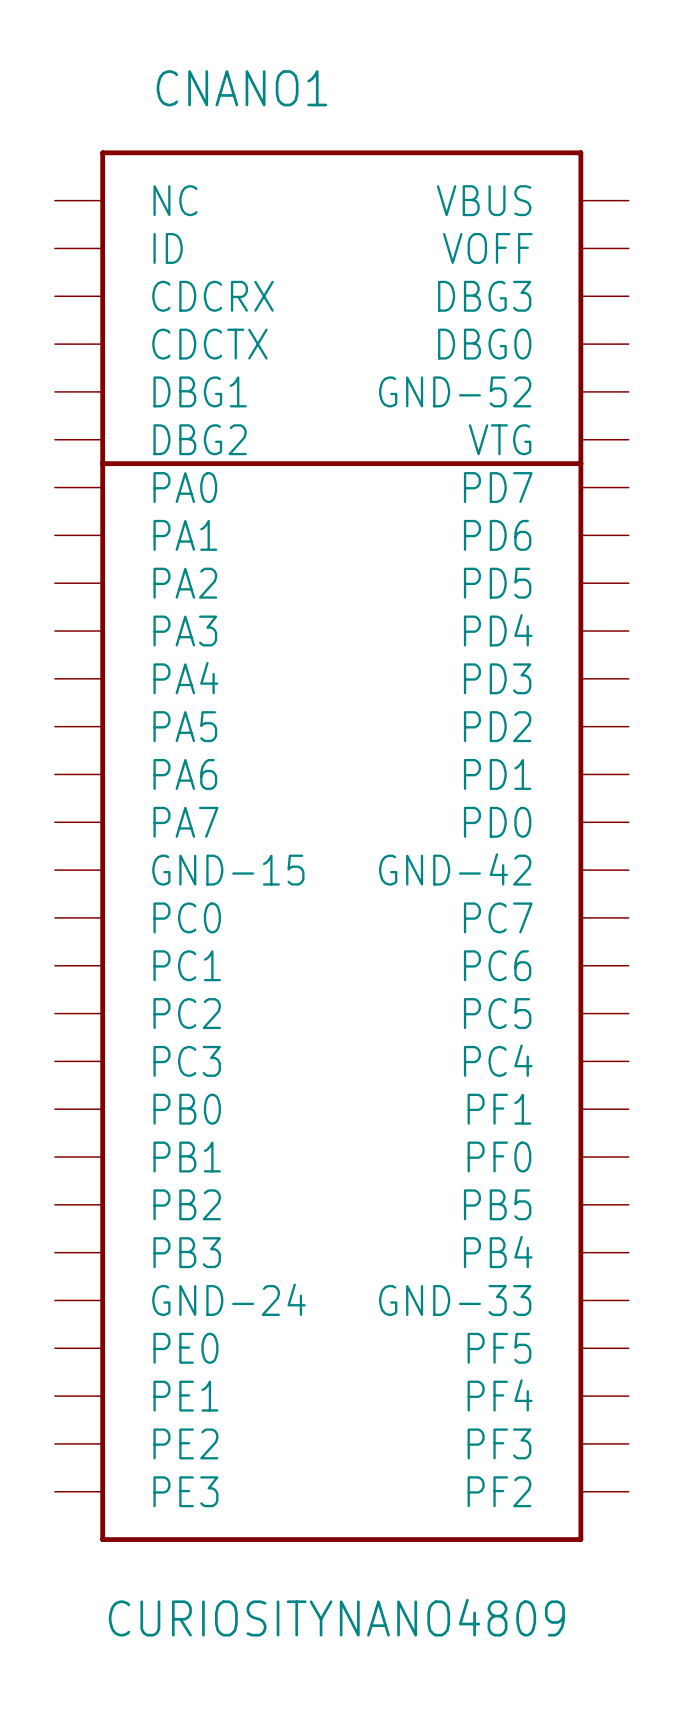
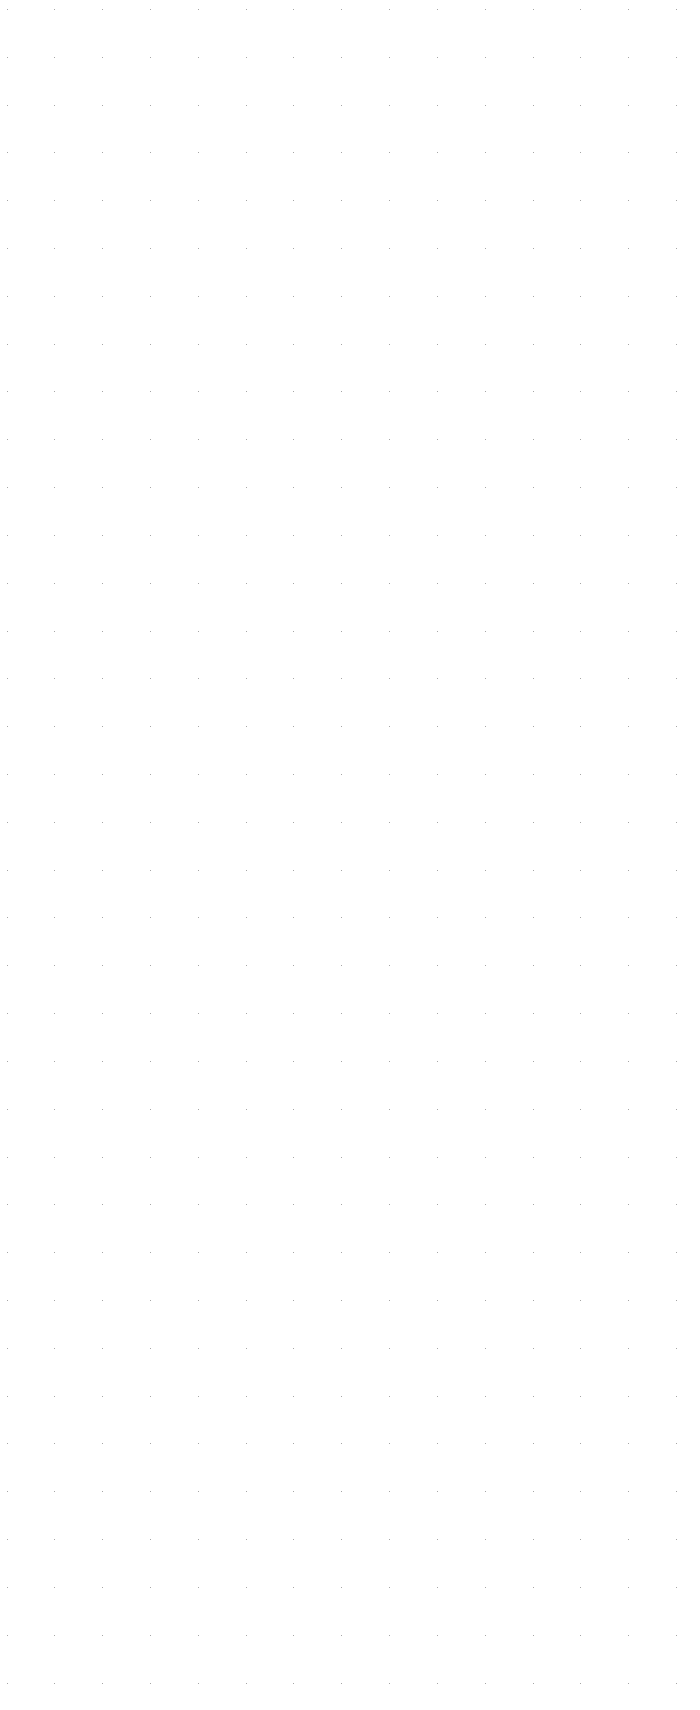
CNANO1: CURIOSITYNANO4809 (341, 846) -> none

